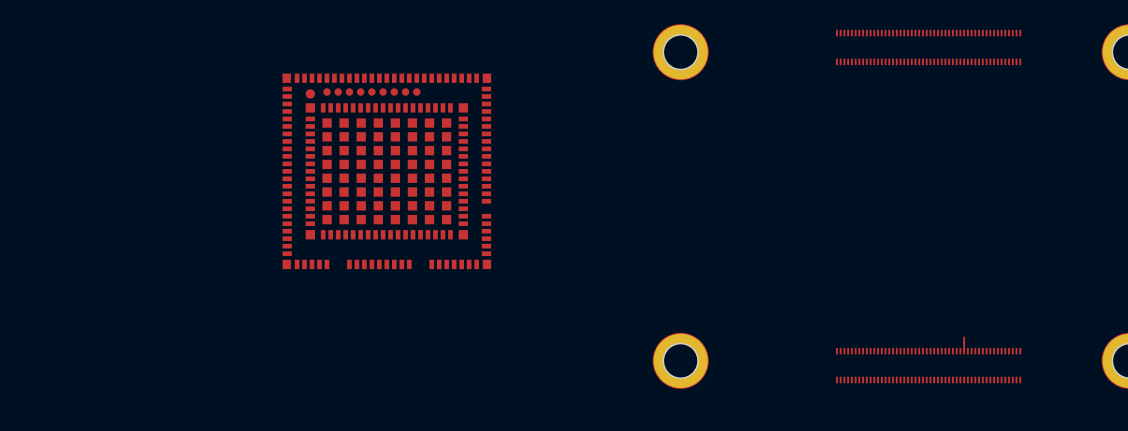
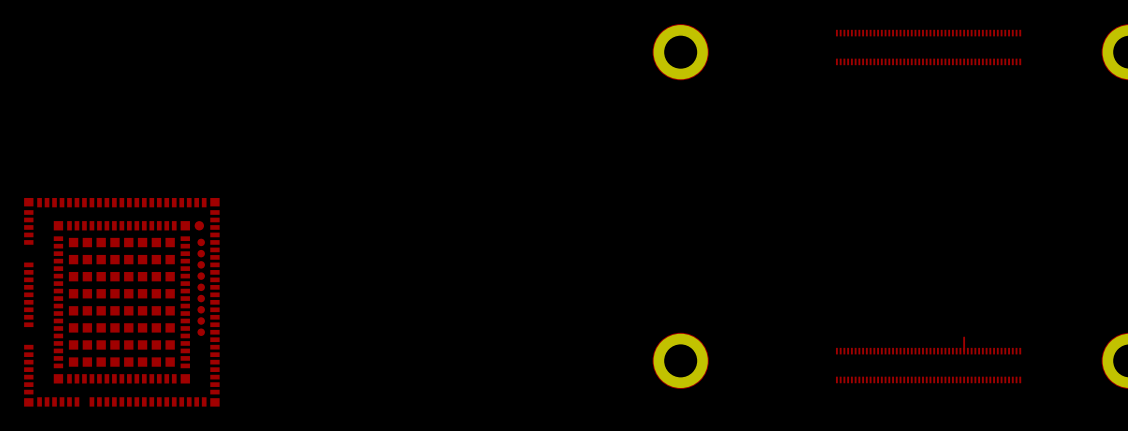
part: (386, 171) -> none
part: none -> (121, 302)

